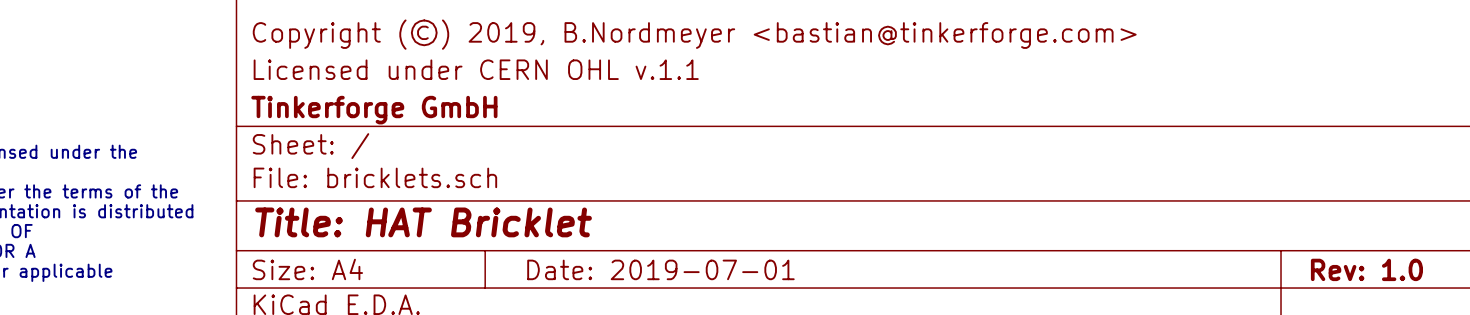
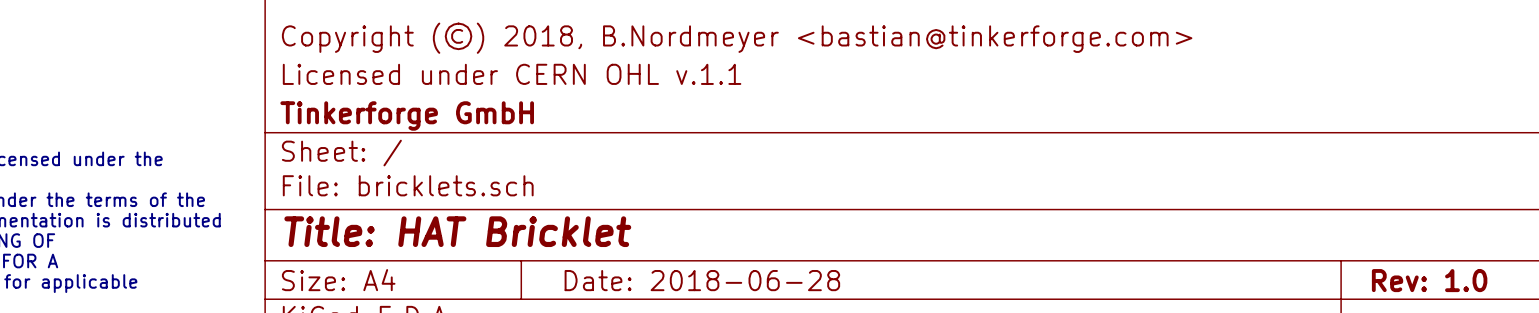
title block: Copyright (©) 2019, B.Nordmeyer <bastian@tinkerforge.com> (694, 34) -> Copyright (©) 2018, B.Nordmeyer <bastian@tinkerforge.com> (737, 38)
title block: Date: 2019-07-01 (660, 269) -> Date: 2018-06-28 (702, 280)

